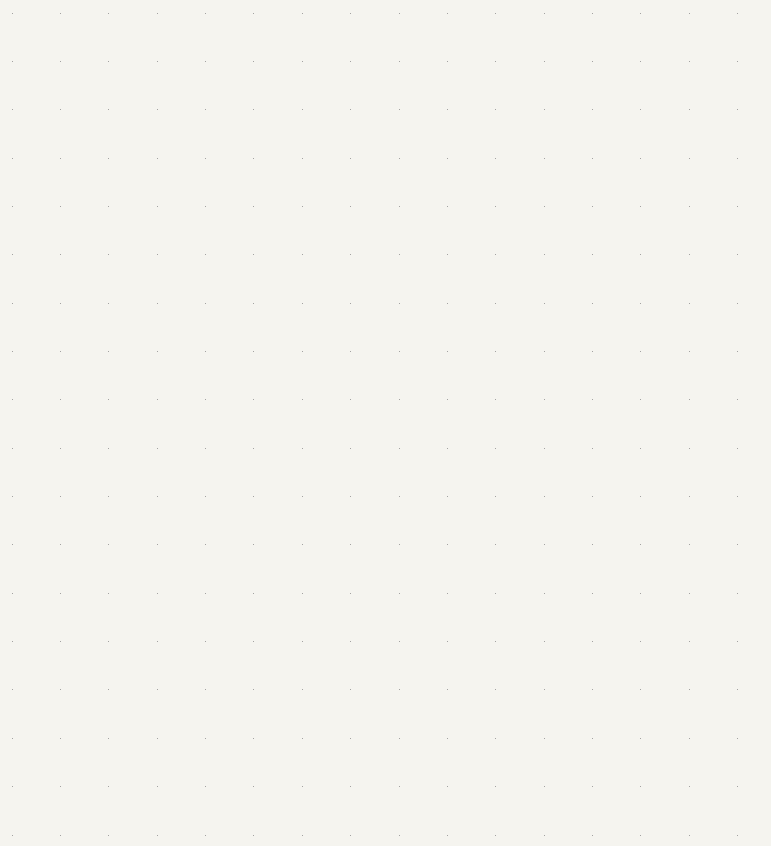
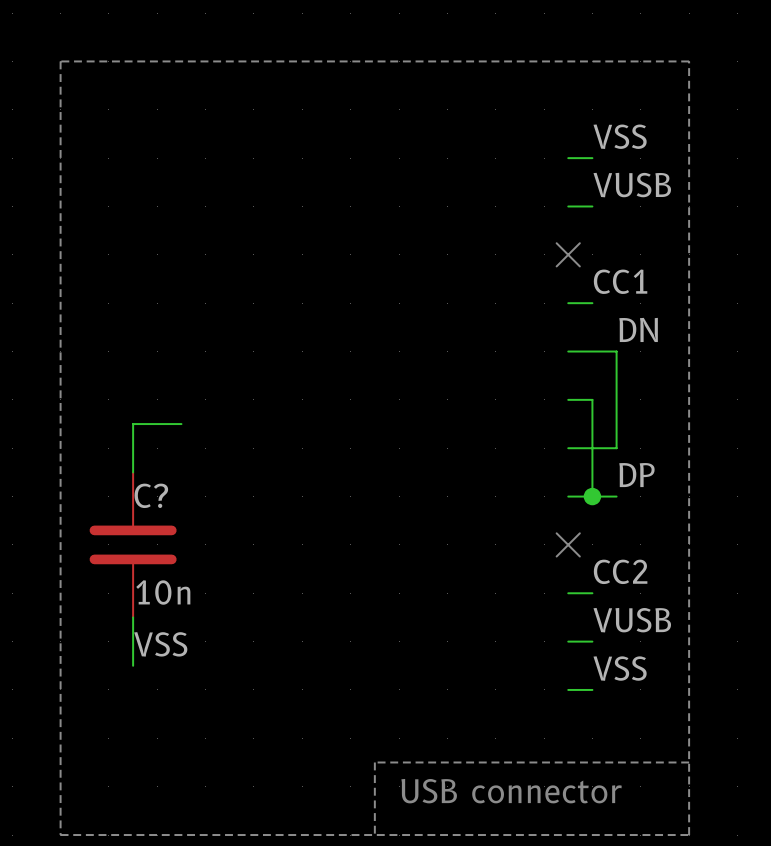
line: none -> (60, 61) (689, 61) (689, 835) (60, 835) (60, 61)
label: none -> VSS (620, 136)
wire: none -> (568, 158) (592, 158)
label: none -> VUSB (632, 185)
wire: none -> (568, 206) (592, 206)
no-connect mark: none -> (568, 254)
label: none -> CC1 (620, 281)
wire: none -> (568, 303) (592, 303)
label: none -> DN (638, 329)
wire: none -> (568, 351) (616, 351) (616, 448) (568, 448)
wire: none -> (568, 399) (592, 399) (592, 496)
wire: none -> (181, 424) (133, 424) (133, 472)
label: none -> DP (636, 475)
wire: none -> (568, 496) (616, 496)
junction: none -> (592, 496)
C?: none -> 10n (133, 544)
no-connect mark: none -> (568, 544)
label: none -> CC2 (620, 571)
wire: none -> (568, 593) (592, 593)
wire: none -> (133, 617) (133, 665)
label: none -> VUSB (632, 620)
wire: none -> (568, 641) (592, 641)
label: none -> VSS (160, 644)
label: none -> VSS (620, 668)
wire: none -> (568, 689) (592, 689)
line: none -> (689, 762) (374, 762) (374, 835)
text: none -> USB connector (511, 791)

